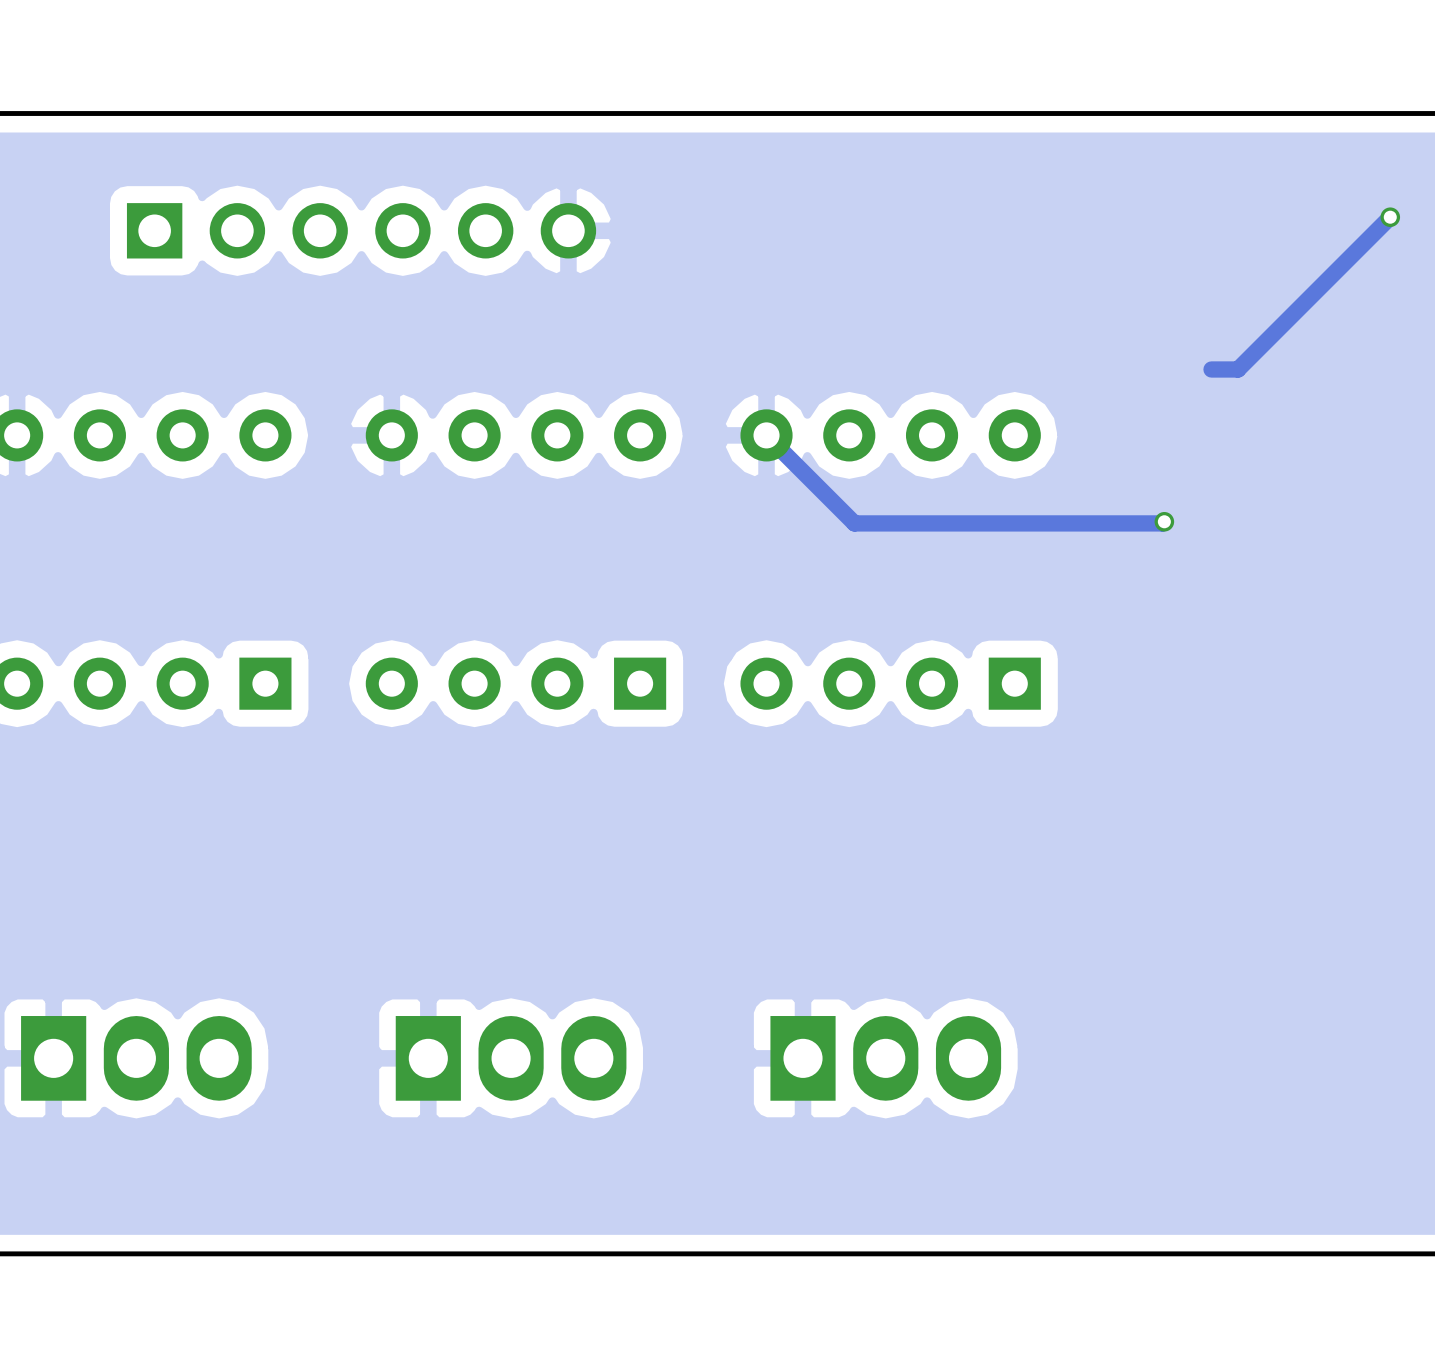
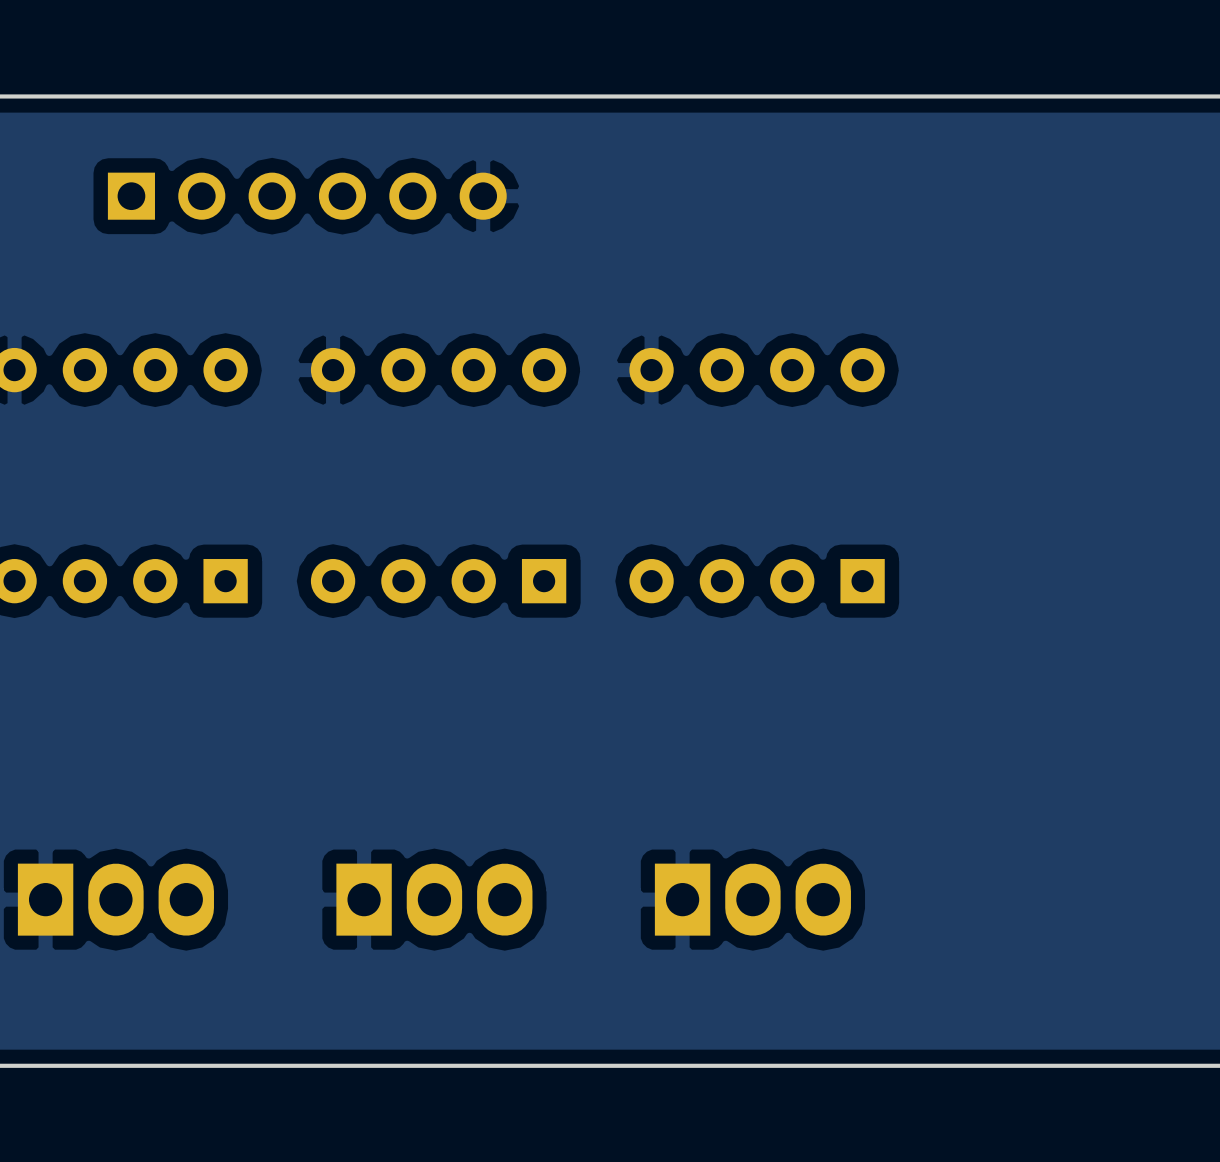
track: (1390, 217) (1238, 369) (1211, 369) -> none
via: (1390, 217) -> none
track: (766, 435) (854, 523) (1162, 523) (1164, 521) -> none
via: (1164, 521) -> none

